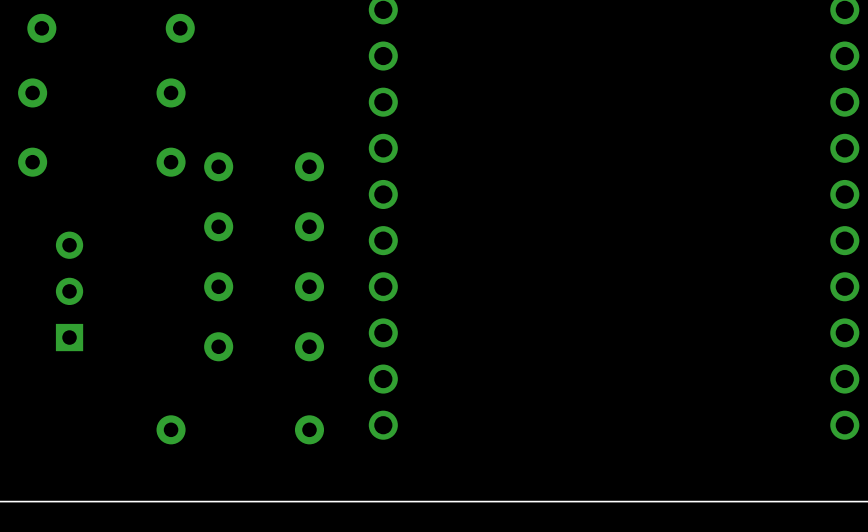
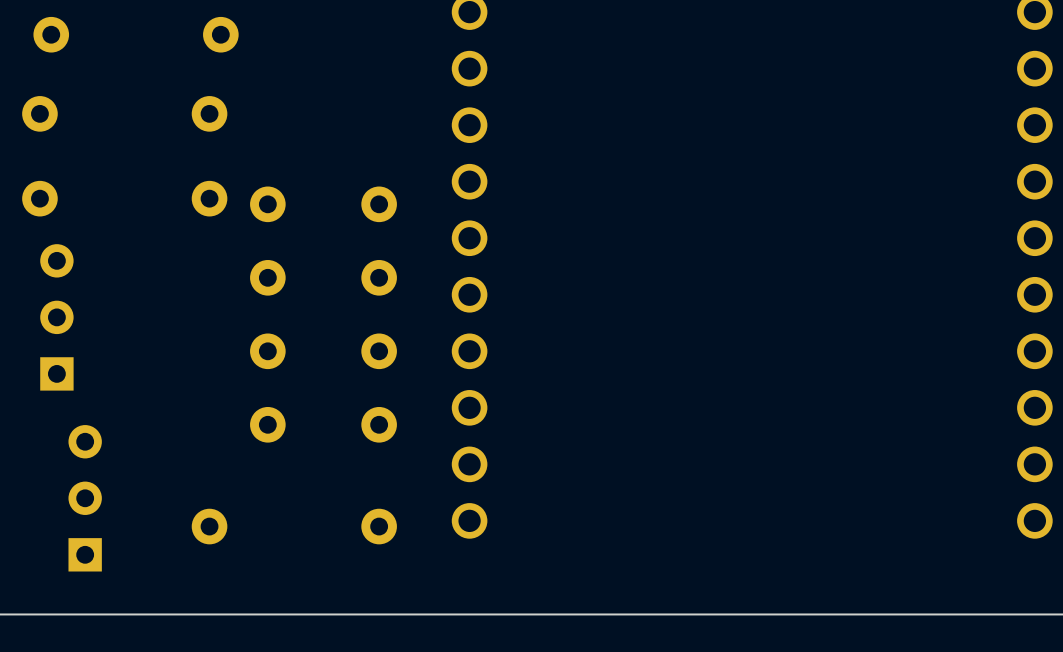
part position: (69, 291) -> (56, 317)
part: none -> (85, 498)

